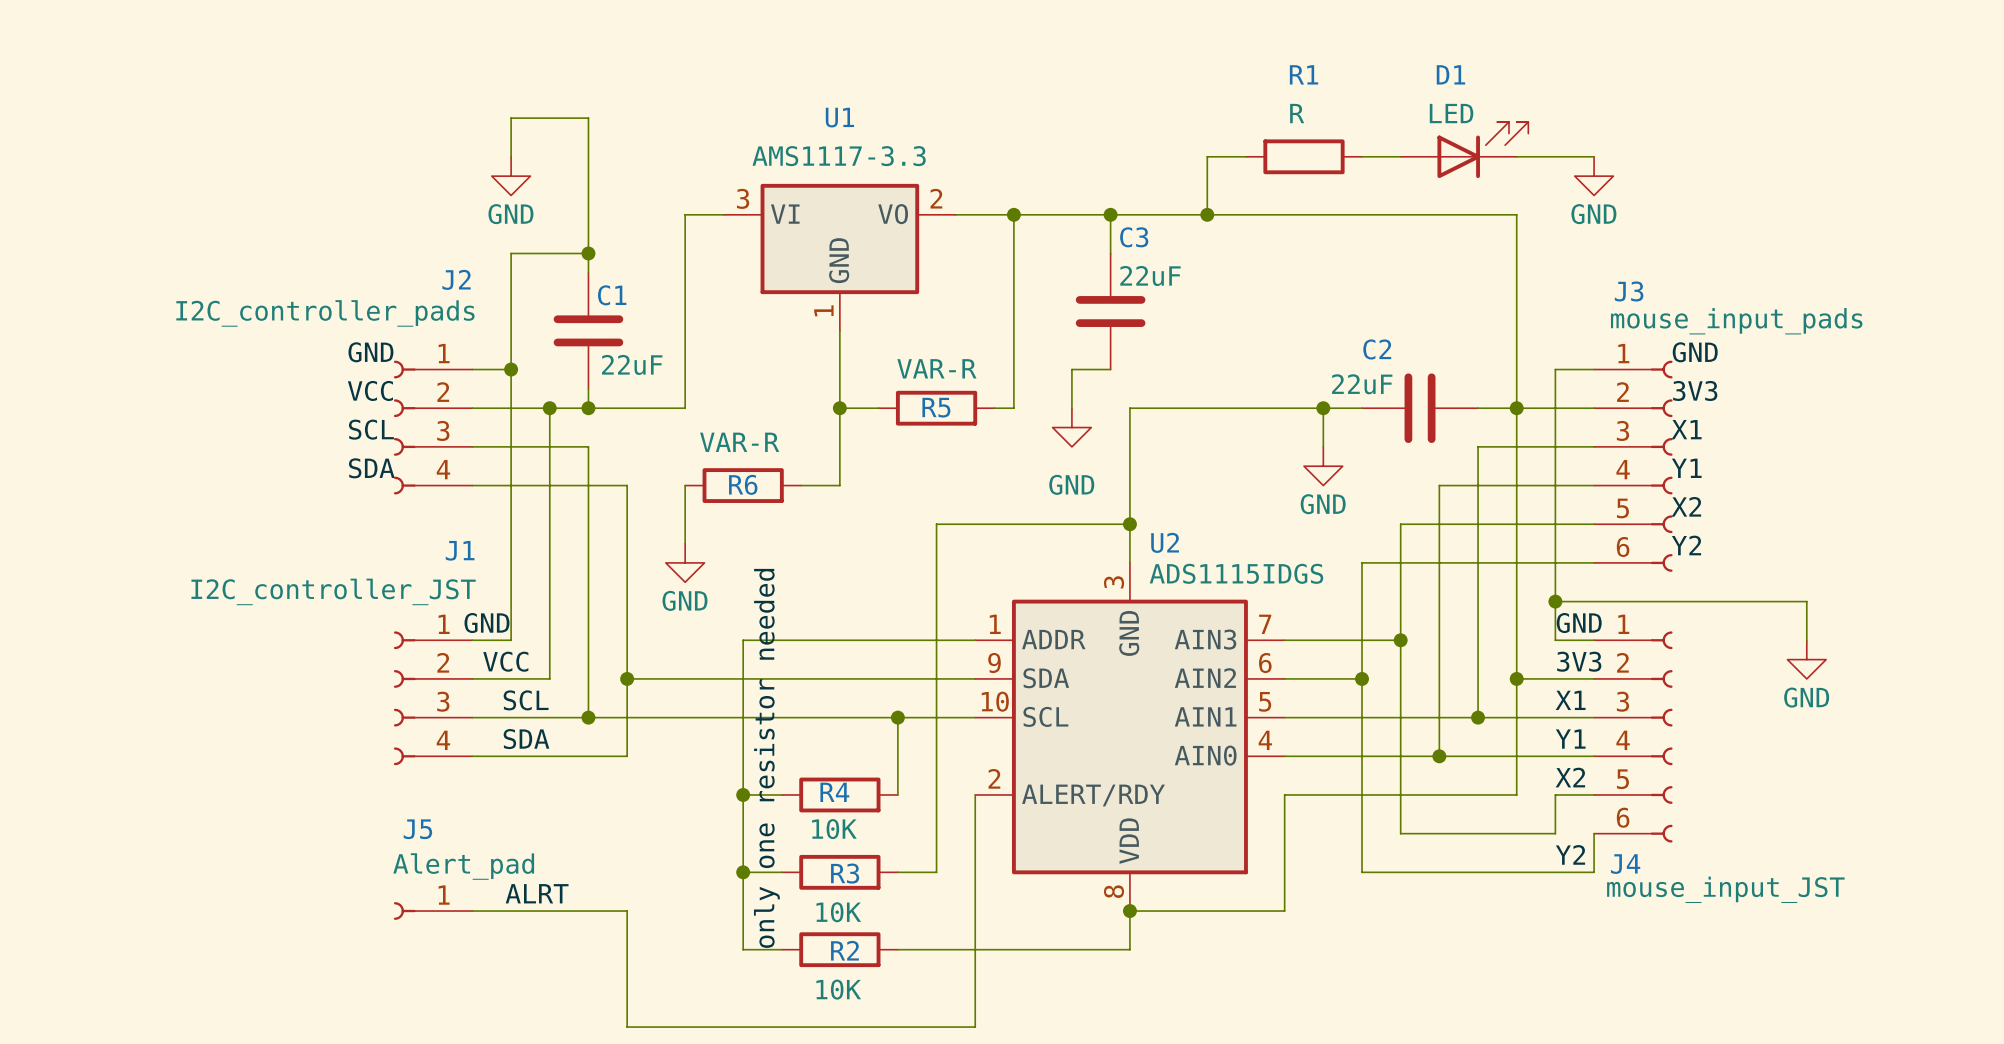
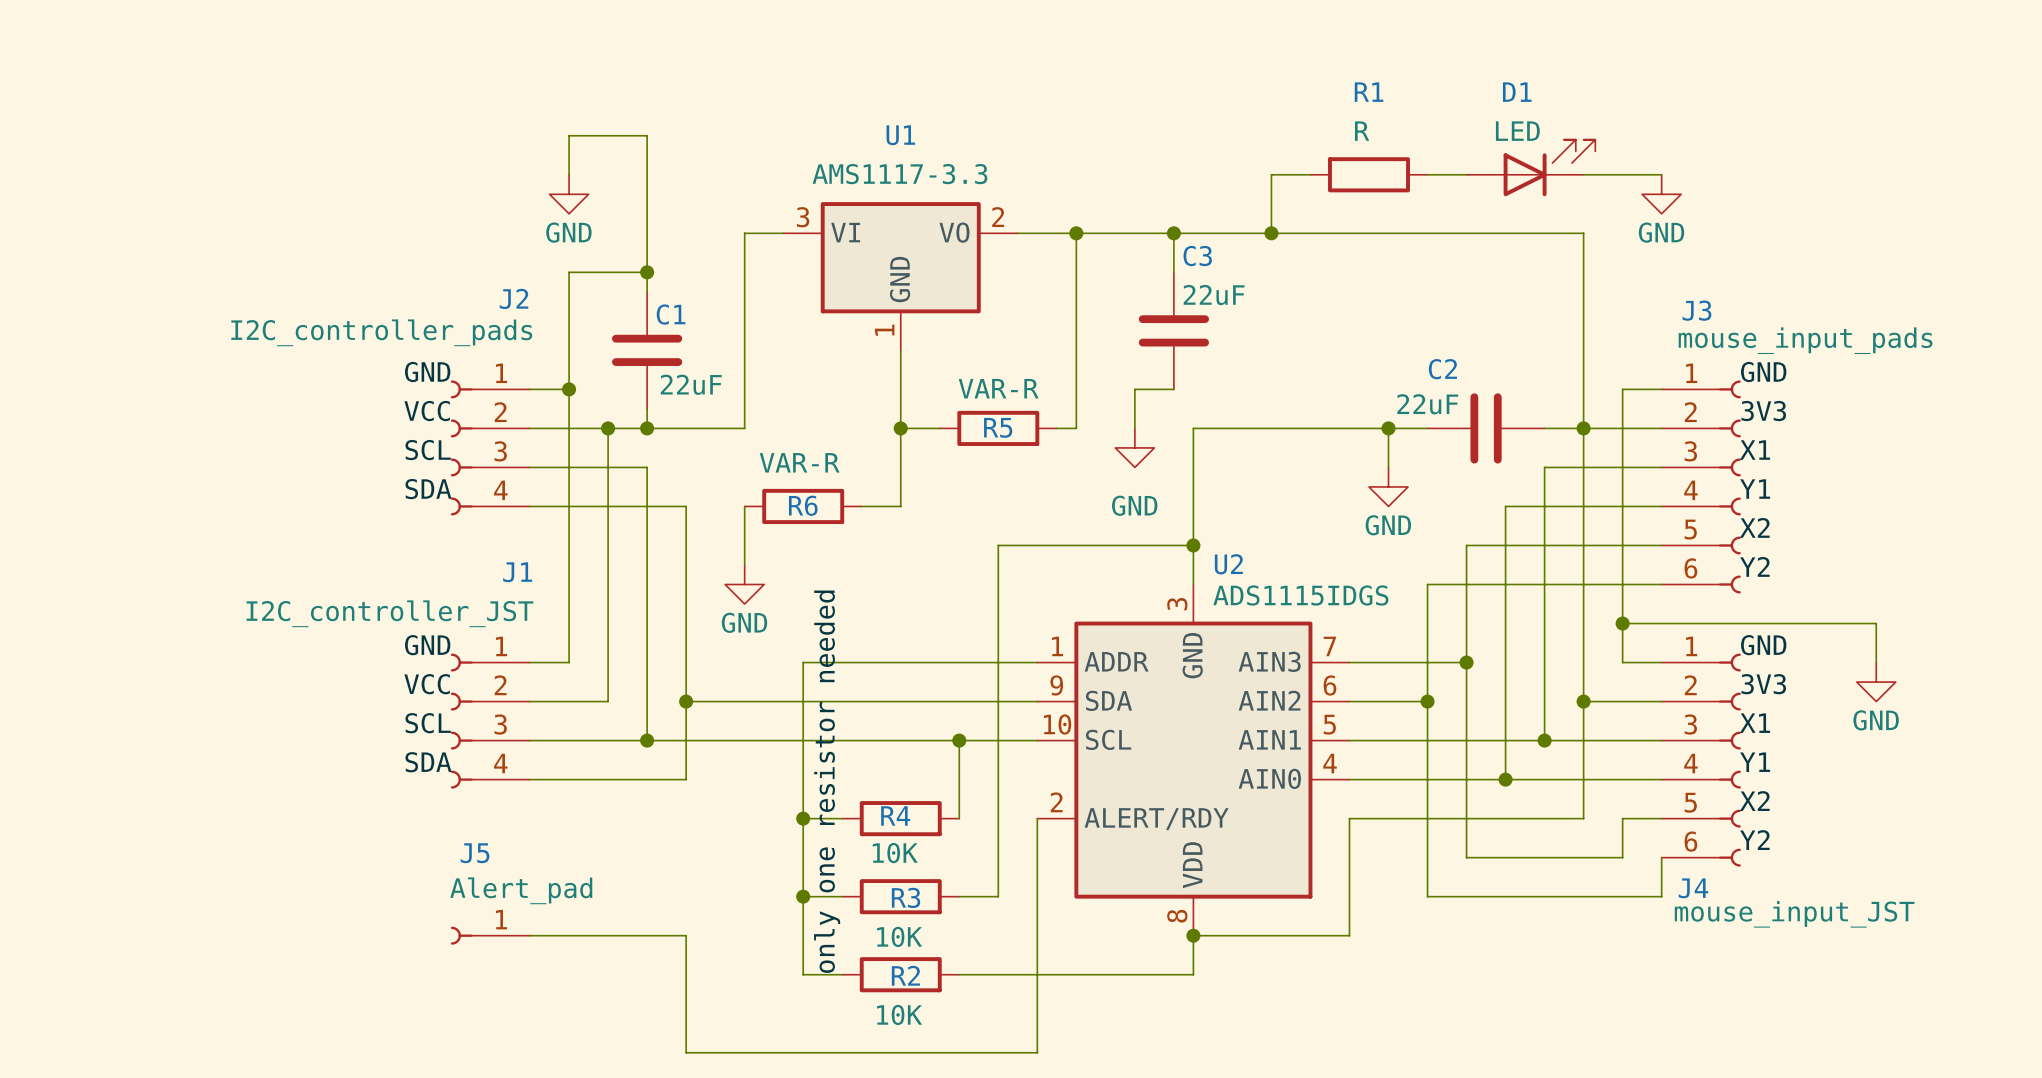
label position: GND (486, 623) -> GND (427, 645)
label position: GND (1579, 623) -> GND (1763, 645)
label position: VCC (505, 661) -> VCC (427, 684)
label position: 3V3 (1579, 661) -> 3V3 (1763, 684)
label position: SCL (526, 700) -> SCL (428, 723)
label position: X1 (1570, 700) -> X1 (1755, 723)
label position: SDA (526, 739) -> SDA (428, 762)
label position: Y1 (1570, 739) -> Y1 (1755, 762)
label position: X2 (1570, 777) -> X2 (1754, 801)
label position: Y2 (1570, 854) -> Y2 (1754, 840)
label: ALRT (537, 893) -> none

